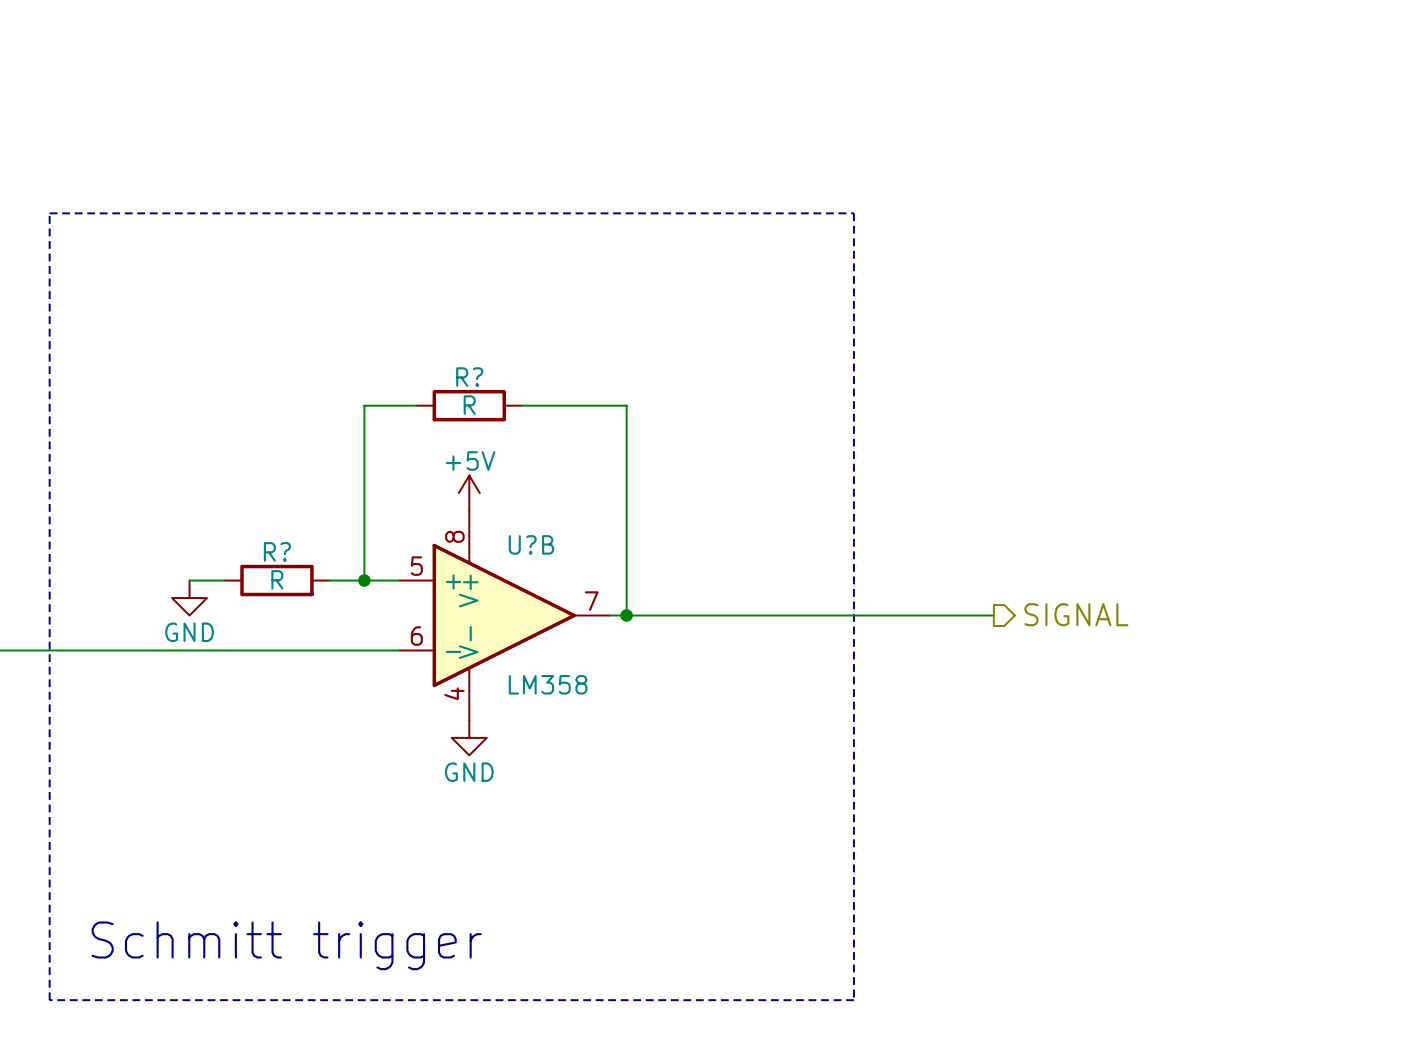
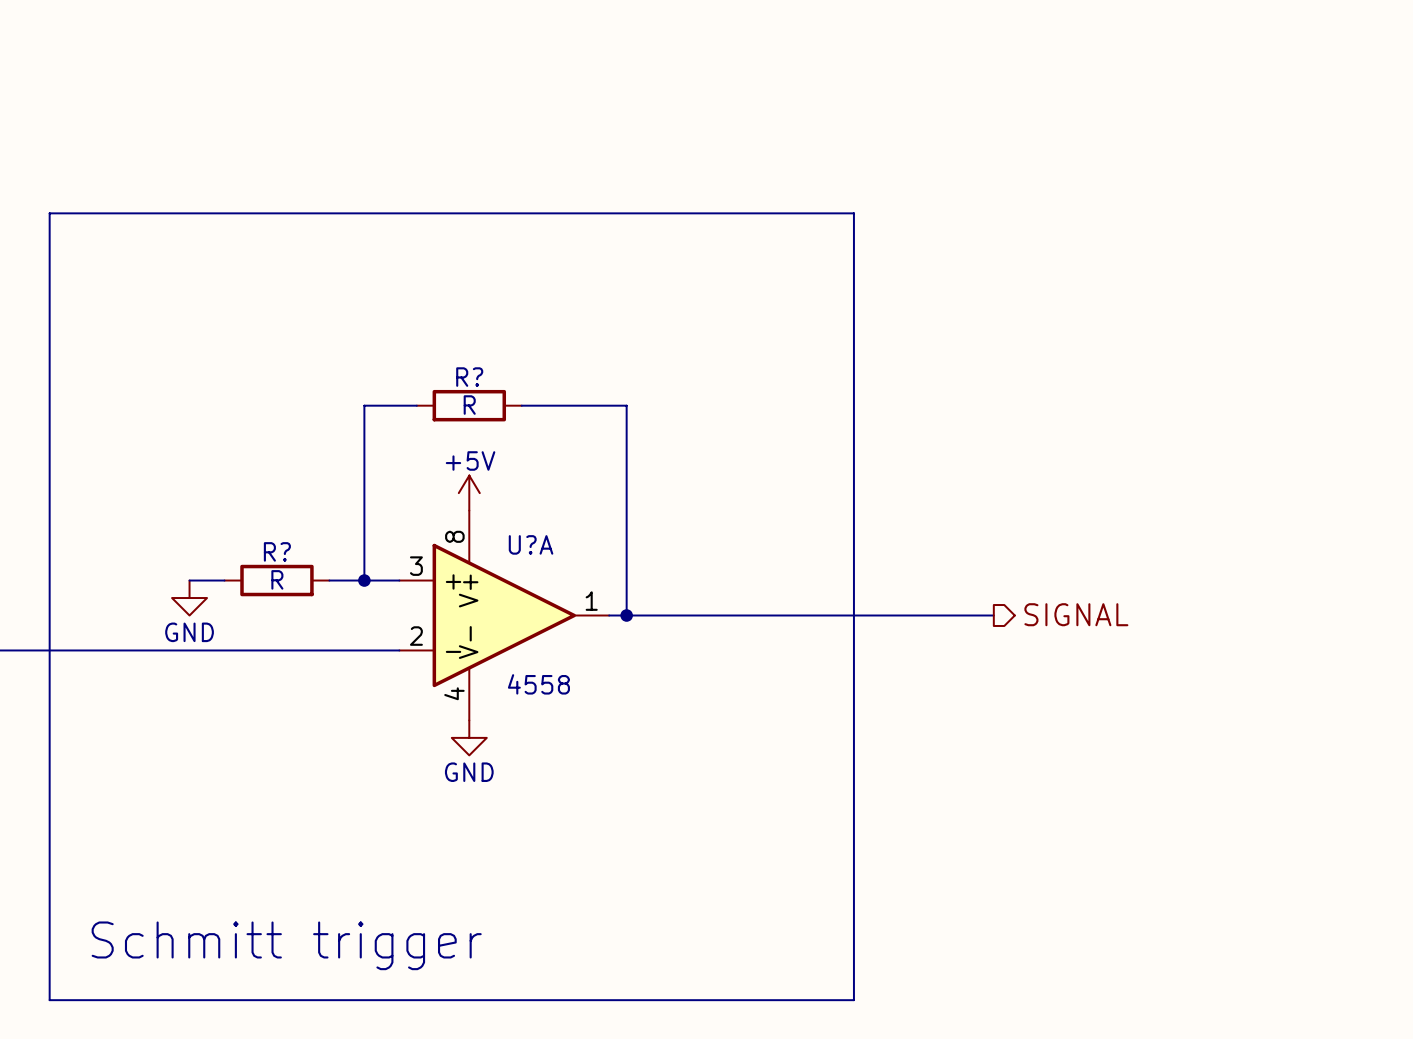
line: (49, 213) (49, 1000) (853, 1000) (853, 213) (49, 213) -> none
bus: none -> (49, 213) (49, 1000) (853, 1000) (853, 213) (49, 213)
U?B name: U?B (531, 544) -> U?A (531, 544)
U?B pin number: 5 (416, 566) -> 3 (416, 566)
U?B pin number: 7 (591, 601) -> 1 (591, 601)
U?B pin number: 6 (416, 636) -> 2 (416, 636)
U?B value: LM358 (548, 684) -> 4558 (538, 684)

